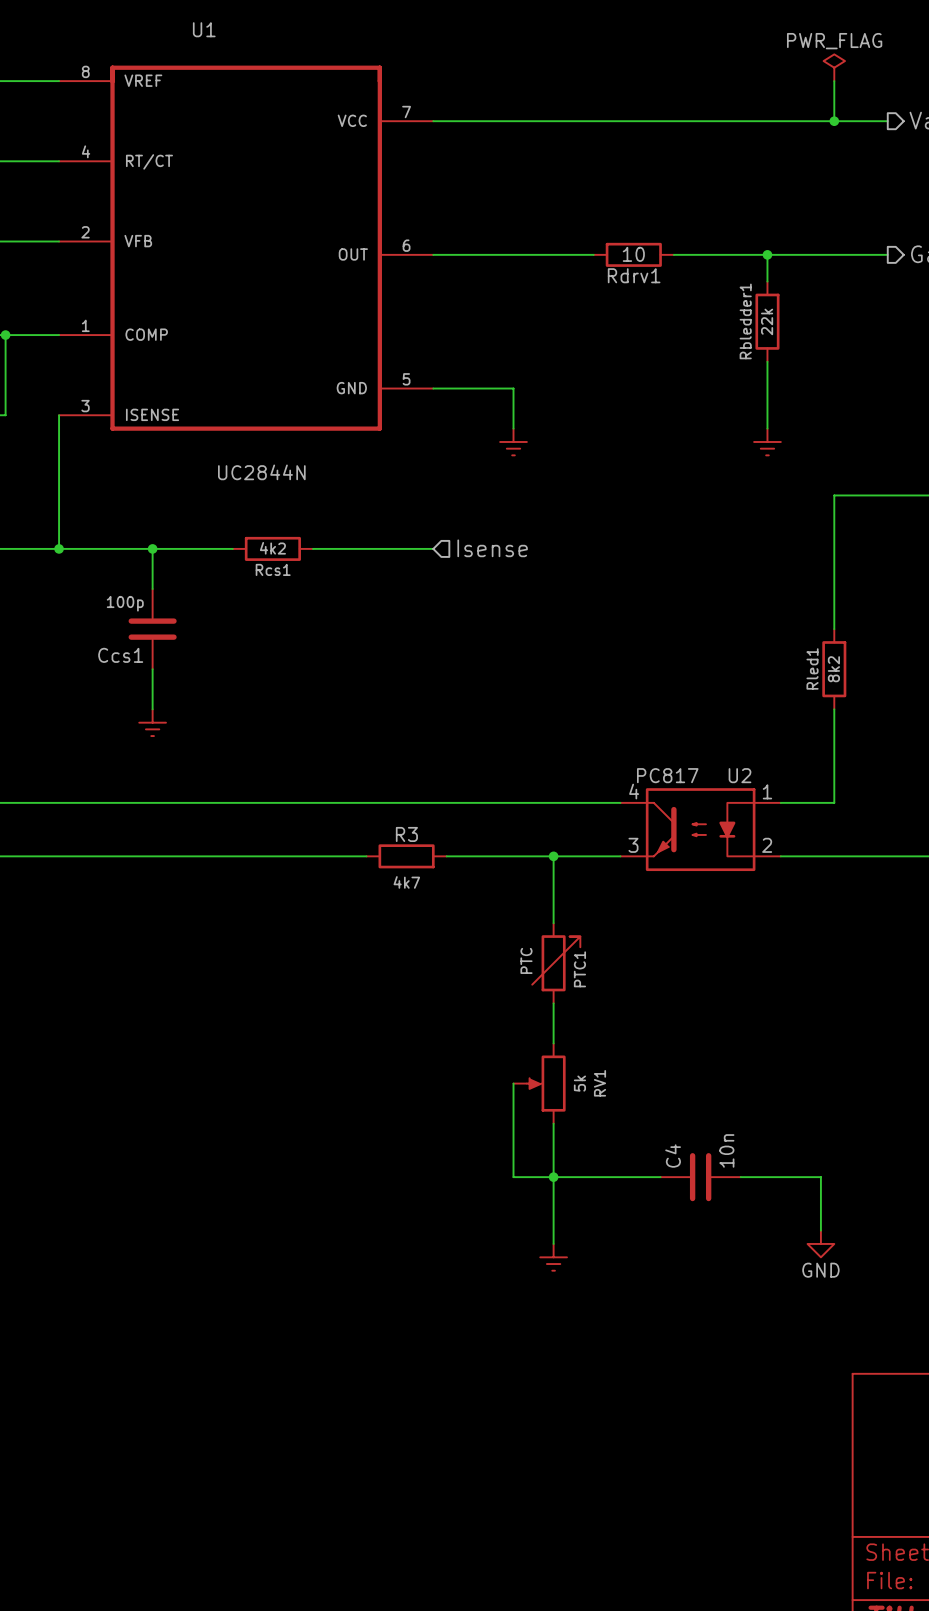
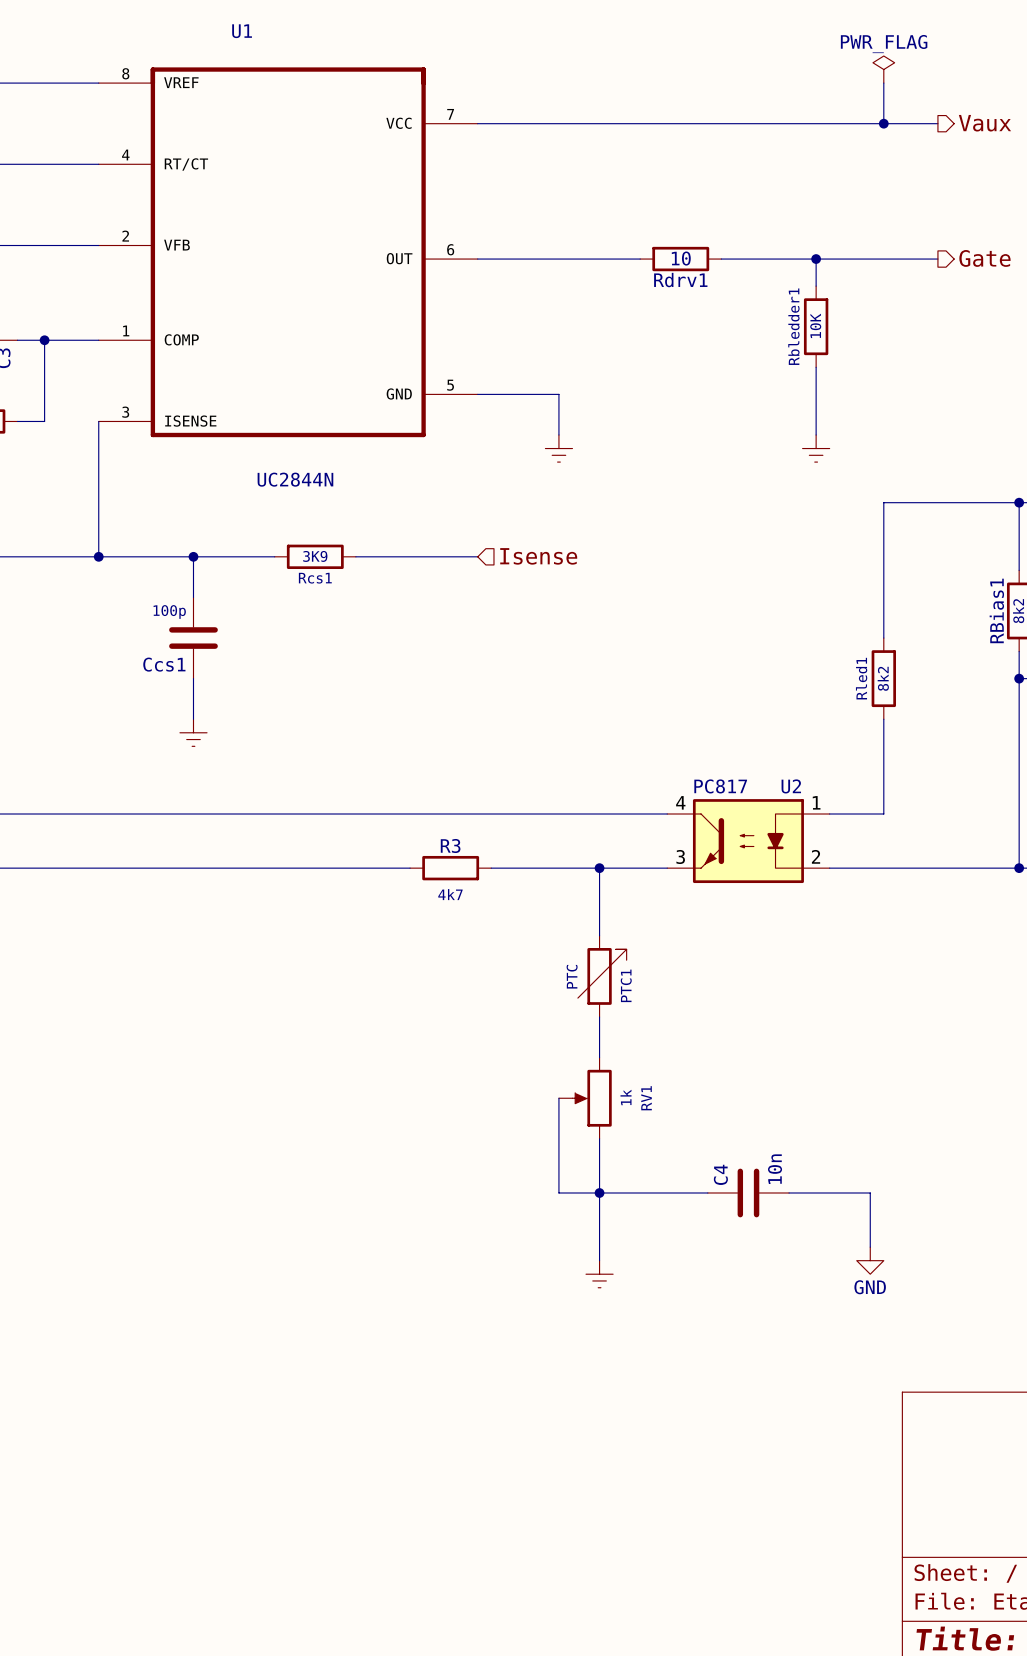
Rbledder1 value: 22k (767, 321) -> 10K (815, 325)
Rcs1 value: 4k2 (272, 548) -> 3K9 (315, 556)
RV1 value: 5k (579, 1083) -> 1k (626, 1097)

